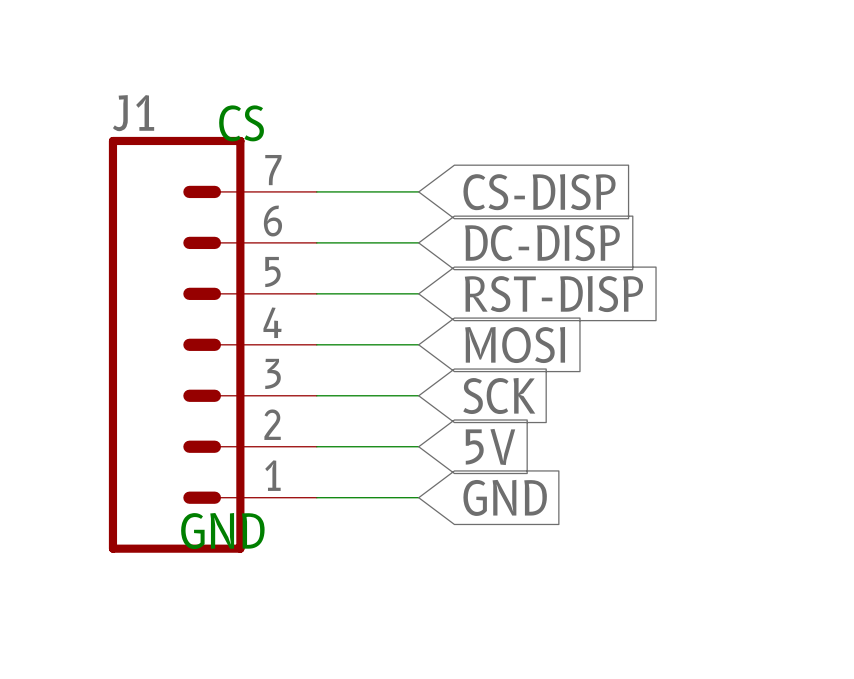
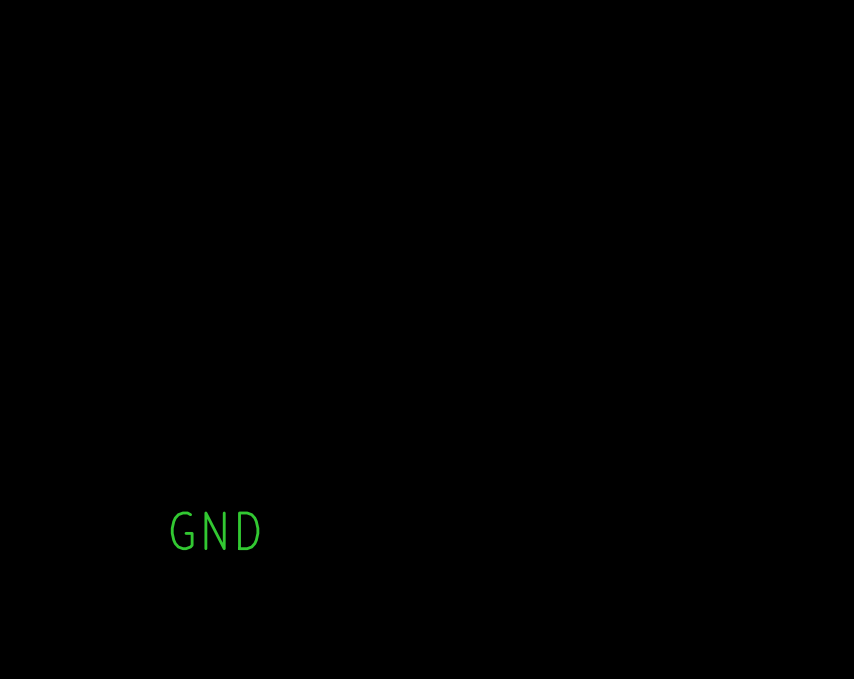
text: CS (241, 123) -> none
wire: (316, 191) (418, 191) -> none
global label: CS-DISP (539, 192) -> none
wire: (316, 242) (418, 242) -> none
global label: DC-DISP (542, 243) -> none
wire: (316, 293) (418, 293) -> none
global label: RST-DISP (553, 294) -> none
J1: (212, 344) -> none
wire: (316, 344) (418, 344) -> none
global label: MOSI (515, 345) -> none
wire: (316, 395) (418, 395) -> none
global label: SCK (499, 395) -> none
wire: (316, 446) (418, 446) -> none
global label: 5V (490, 446) -> none
wire: (316, 497) (418, 497) -> none
global label: GND (505, 497) -> none

